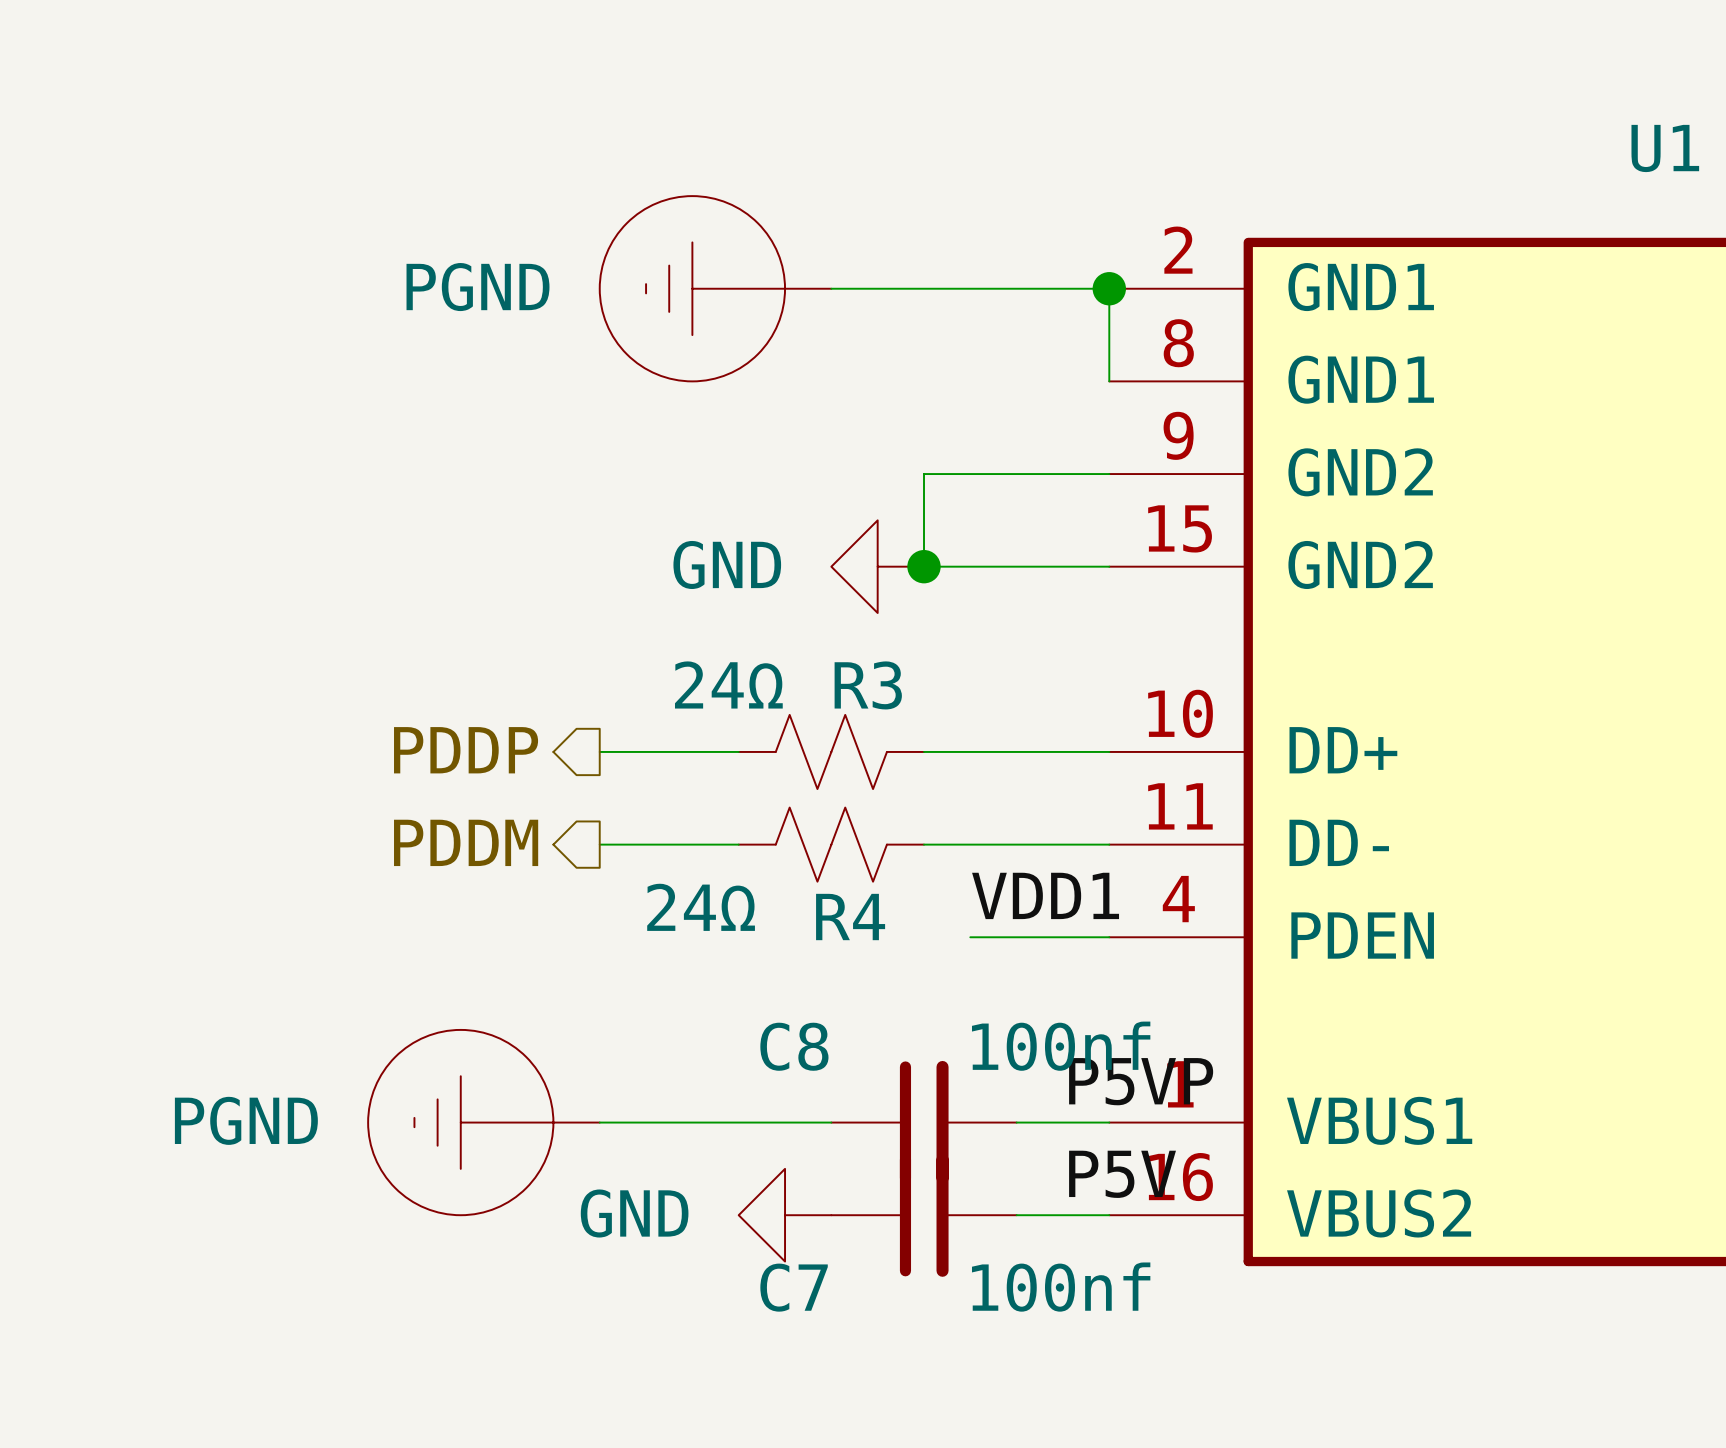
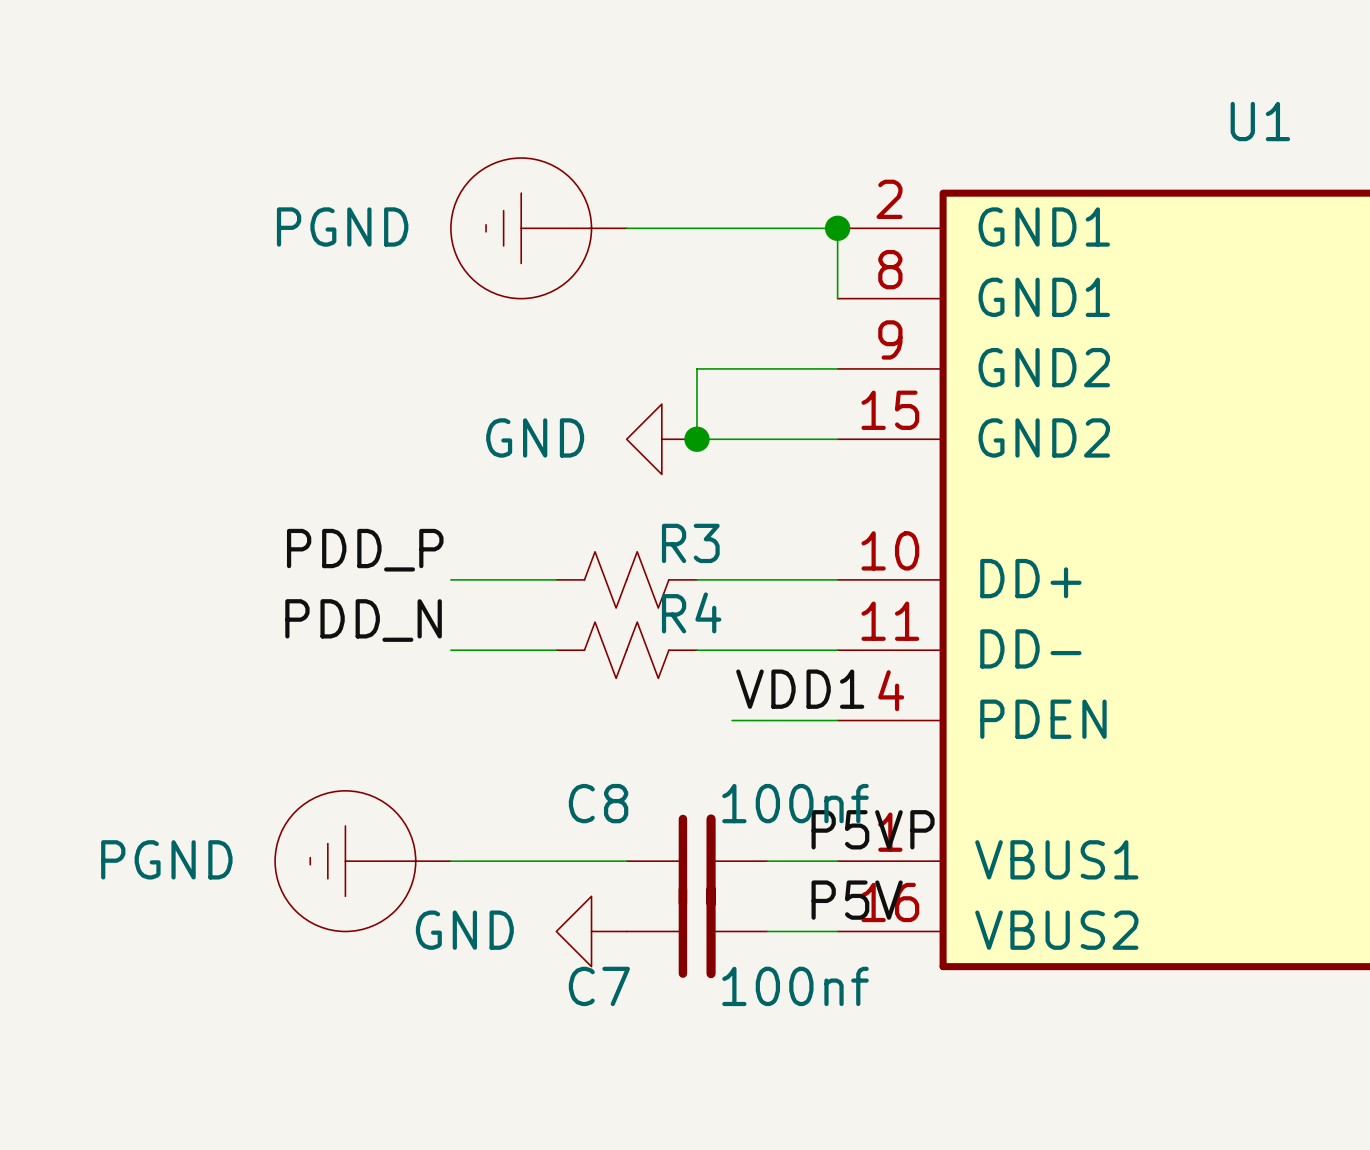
R3 value: 24Ω (728, 684) -> none
R3 name position: R3 (868, 685) -> R3 (690, 543)
label: none -> PDD_P (365, 550)
hierarchical label: PDDP (466, 750) -> none
label: none -> PDD_N (363, 620)
hierarchical label: PDDM (466, 842) -> none
R4 value: 24Ω (701, 907) -> none
R4 name position: R4 (850, 917) -> R4 (691, 612)

